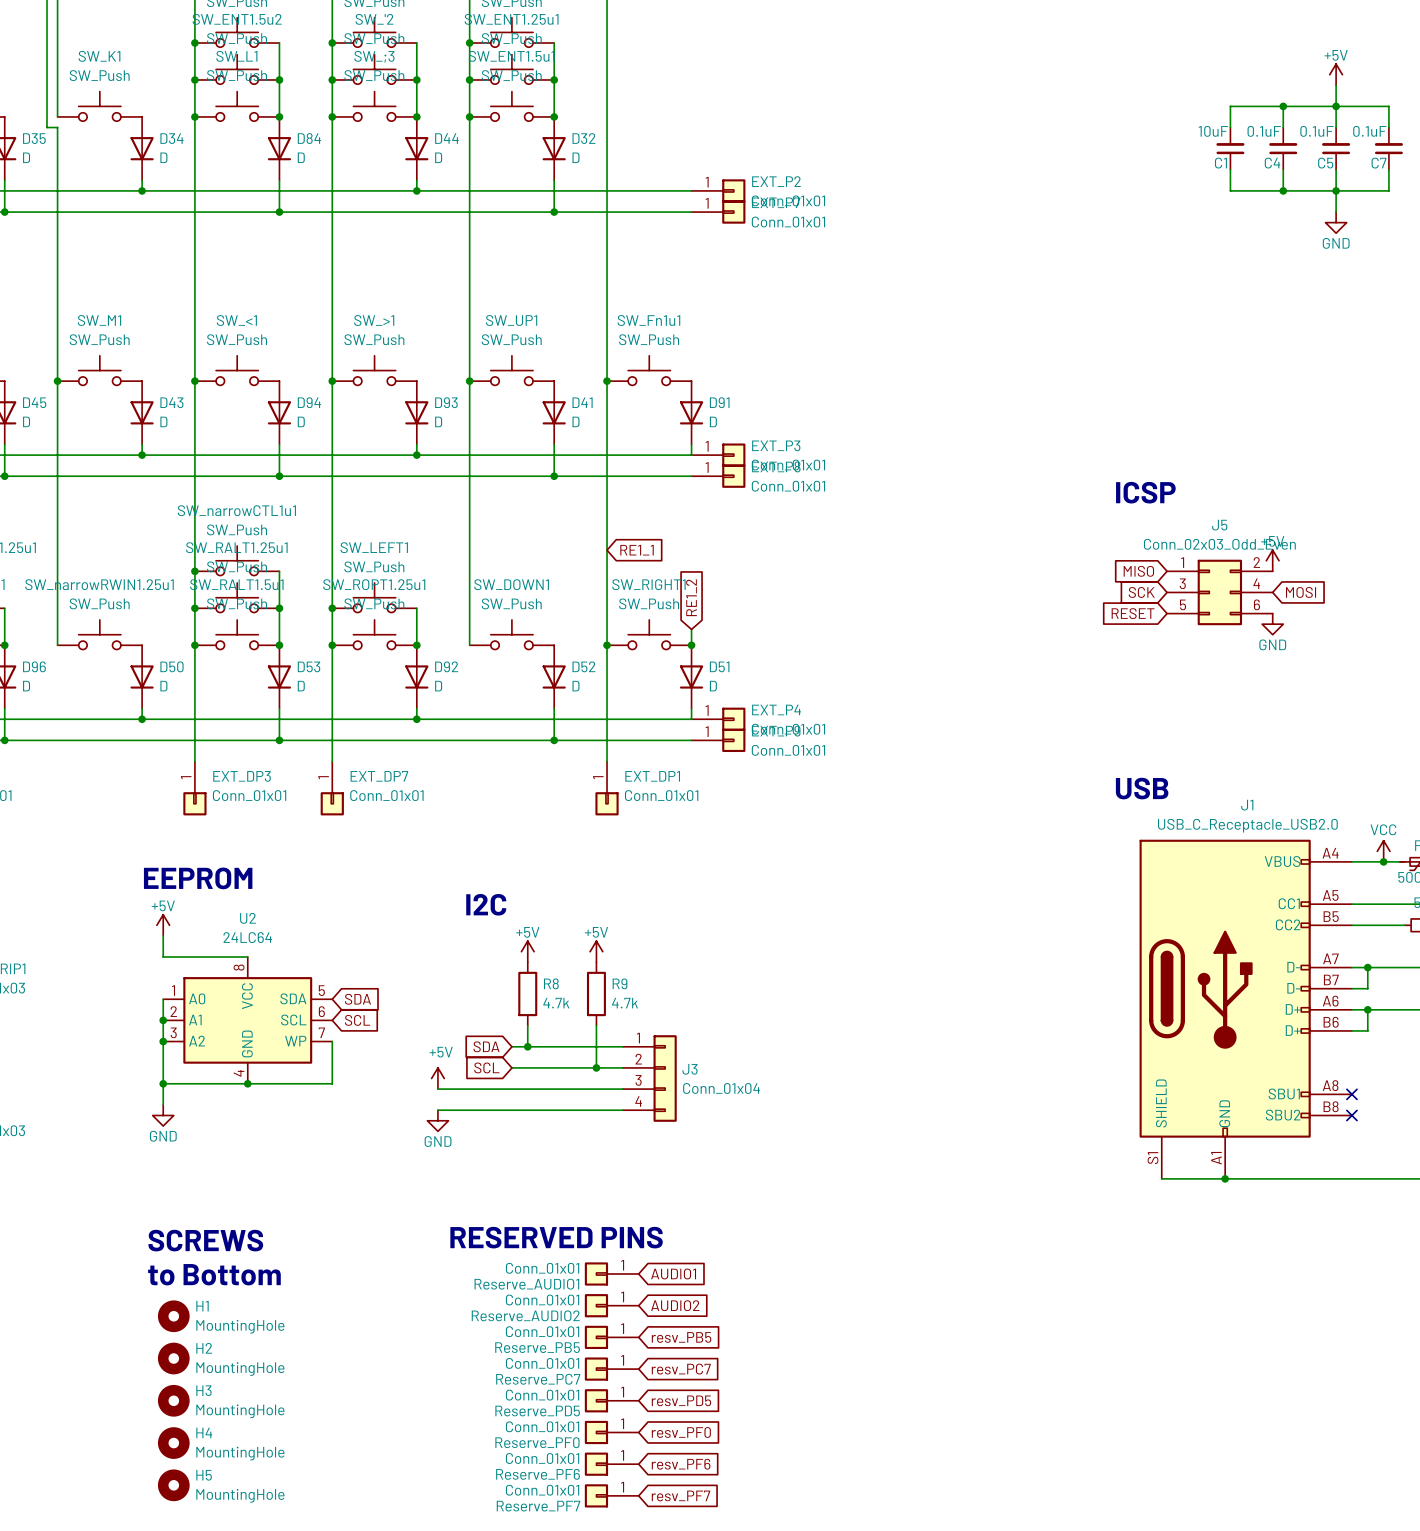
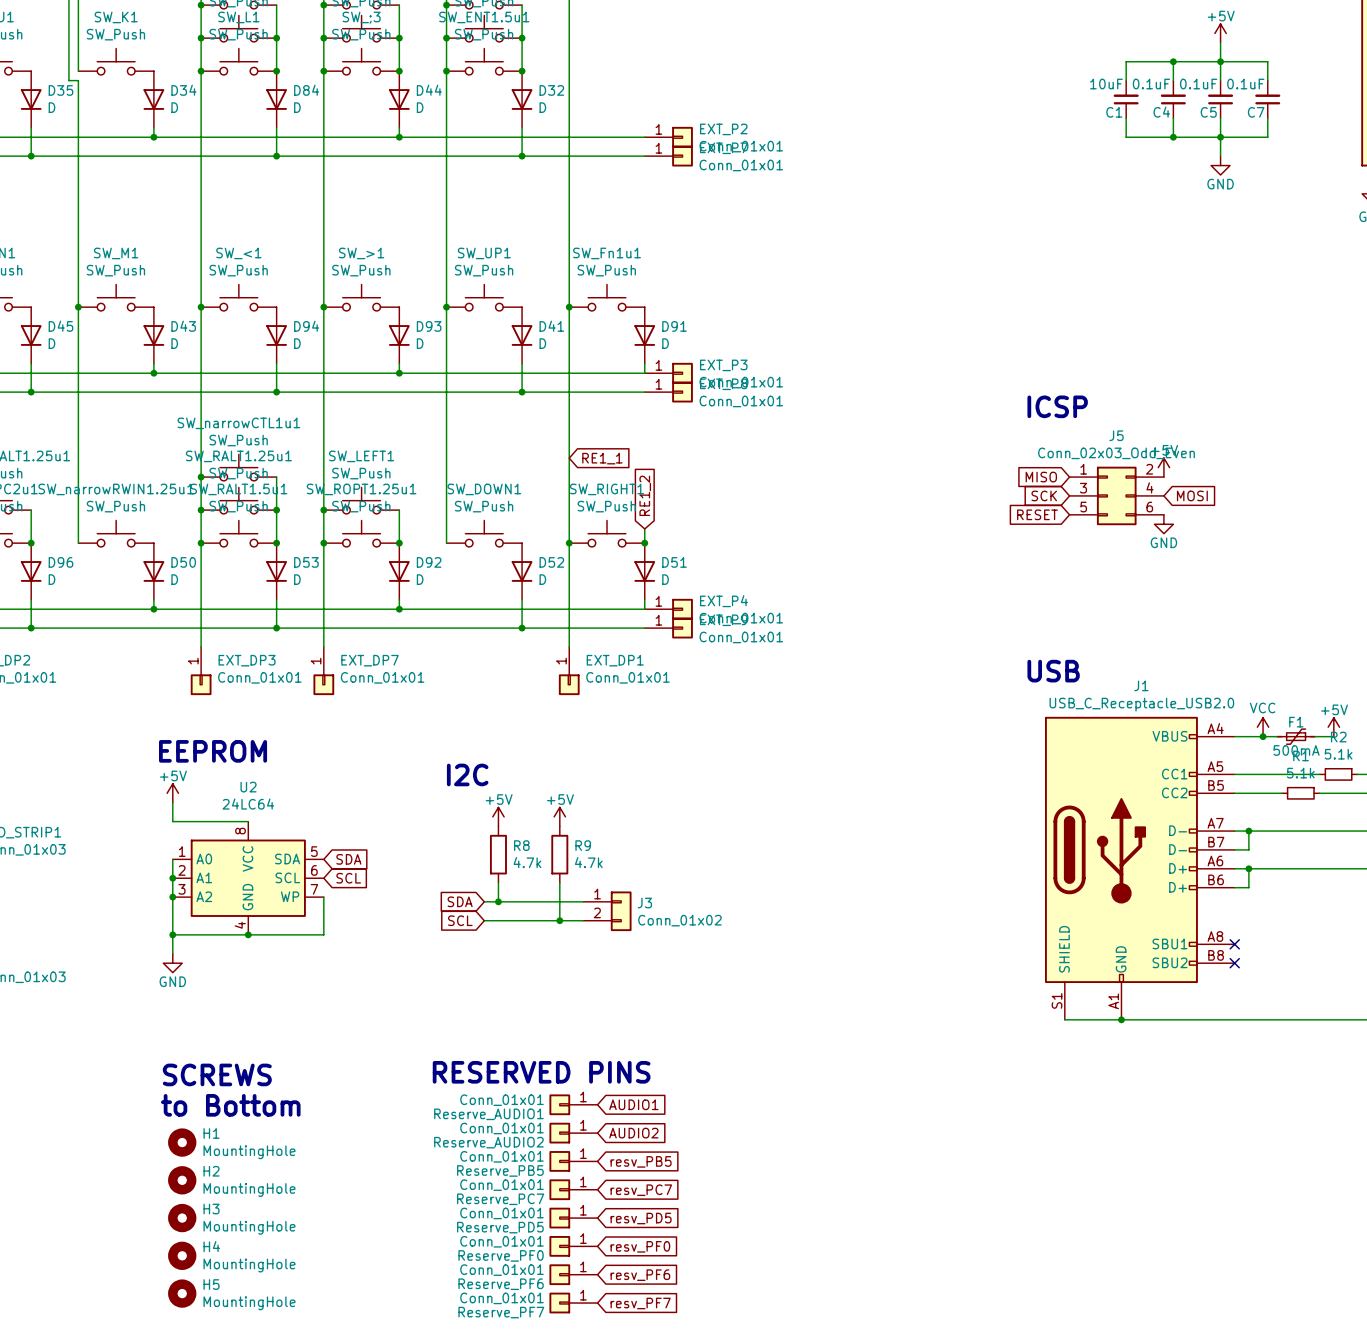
J3 symbol: [622, 1035, 677, 1122] -> [583, 891, 632, 932]
power symbol: +5V (437, 1078) -> none
J3 value: Conn_01x04 (721, 1088) -> Conn_01x02 (679, 920)
wire: (437, 1089) (622, 1089) -> none
wire: (437, 1110) (622, 1110) -> none
power symbol: GND (437, 1120) -> none

